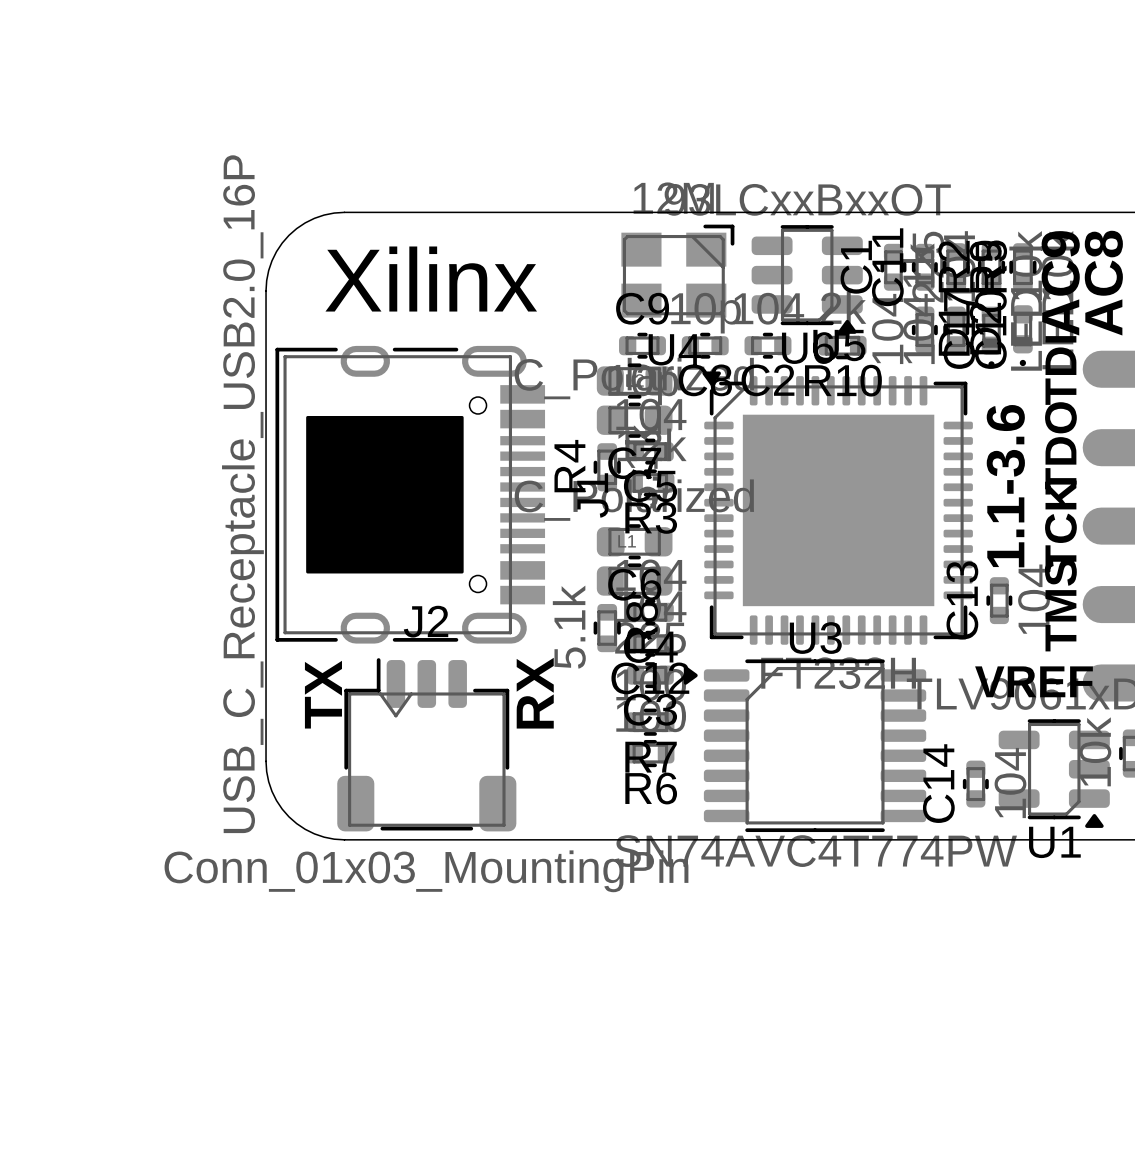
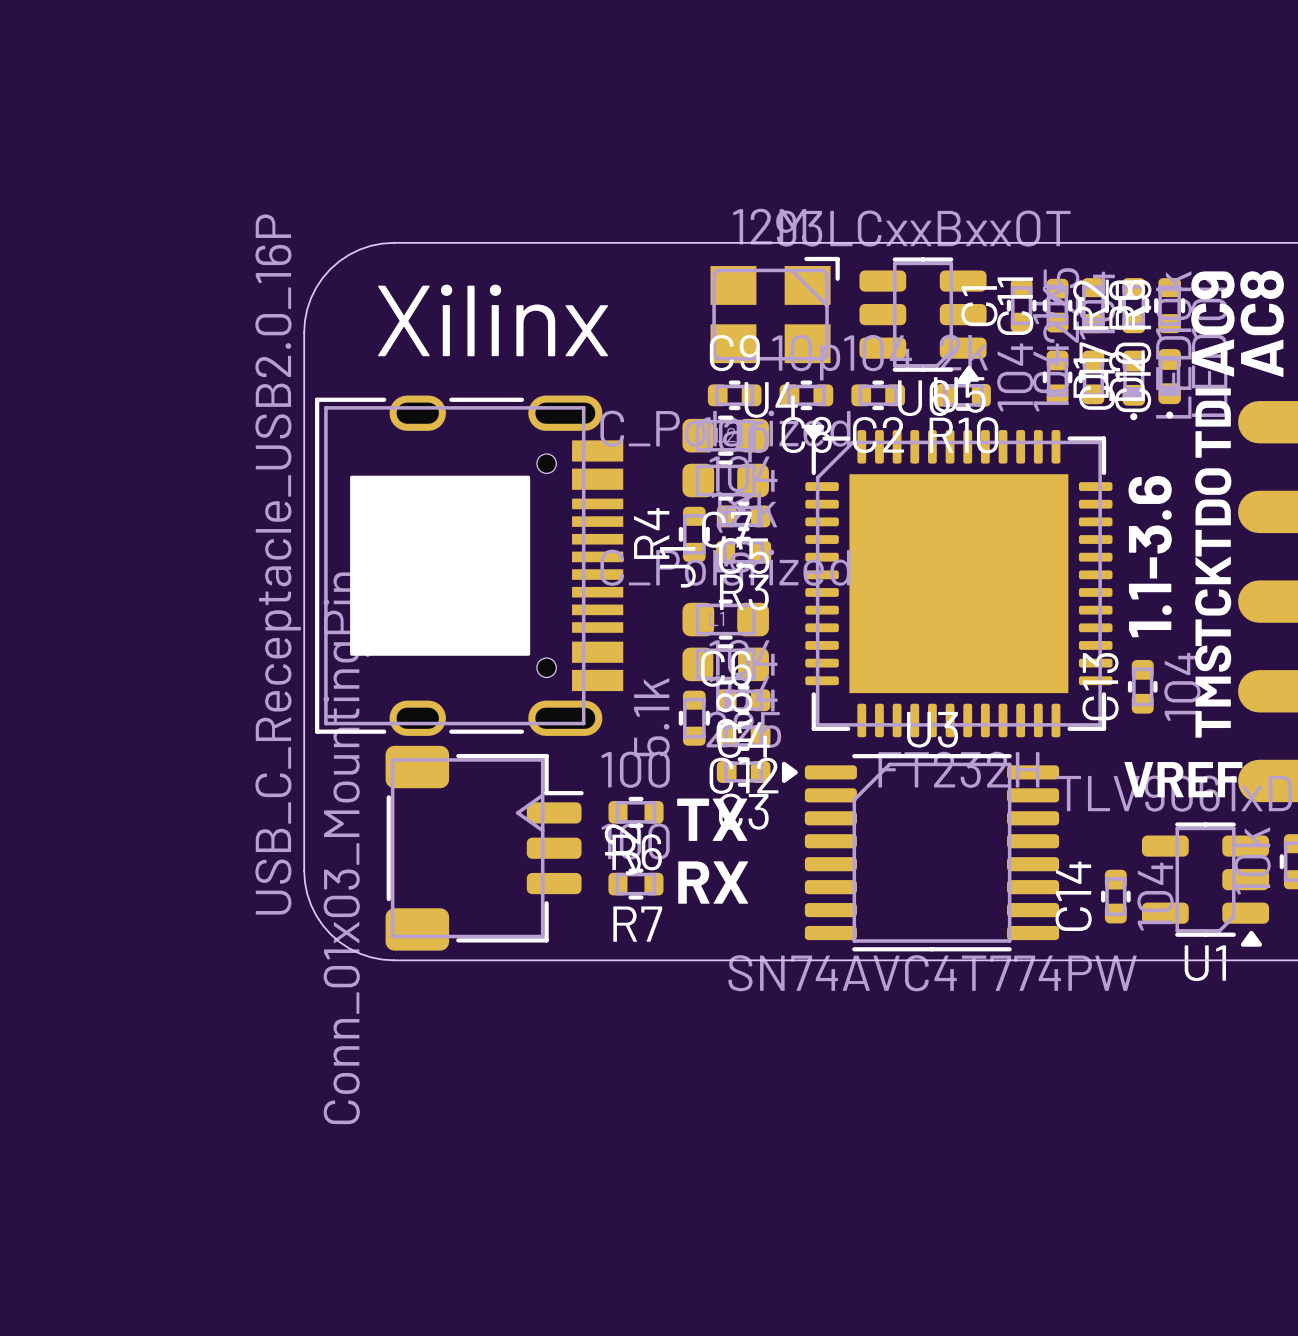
text rotation: 0° (535, 693) -> 90° clockwise (713, 882)
text position: RX (535, 693) -> RX (713, 882)
text rotation: 0° (323, 694) -> 90° clockwise (712, 819)
text position: TX (323, 694) -> TX (712, 819)
R7 position: (650, 722) -> (635, 884)
J2 rotation: 0° (426, 744) -> 90° clockwise (484, 848)
R6 position: (650, 753) -> (636, 812)

